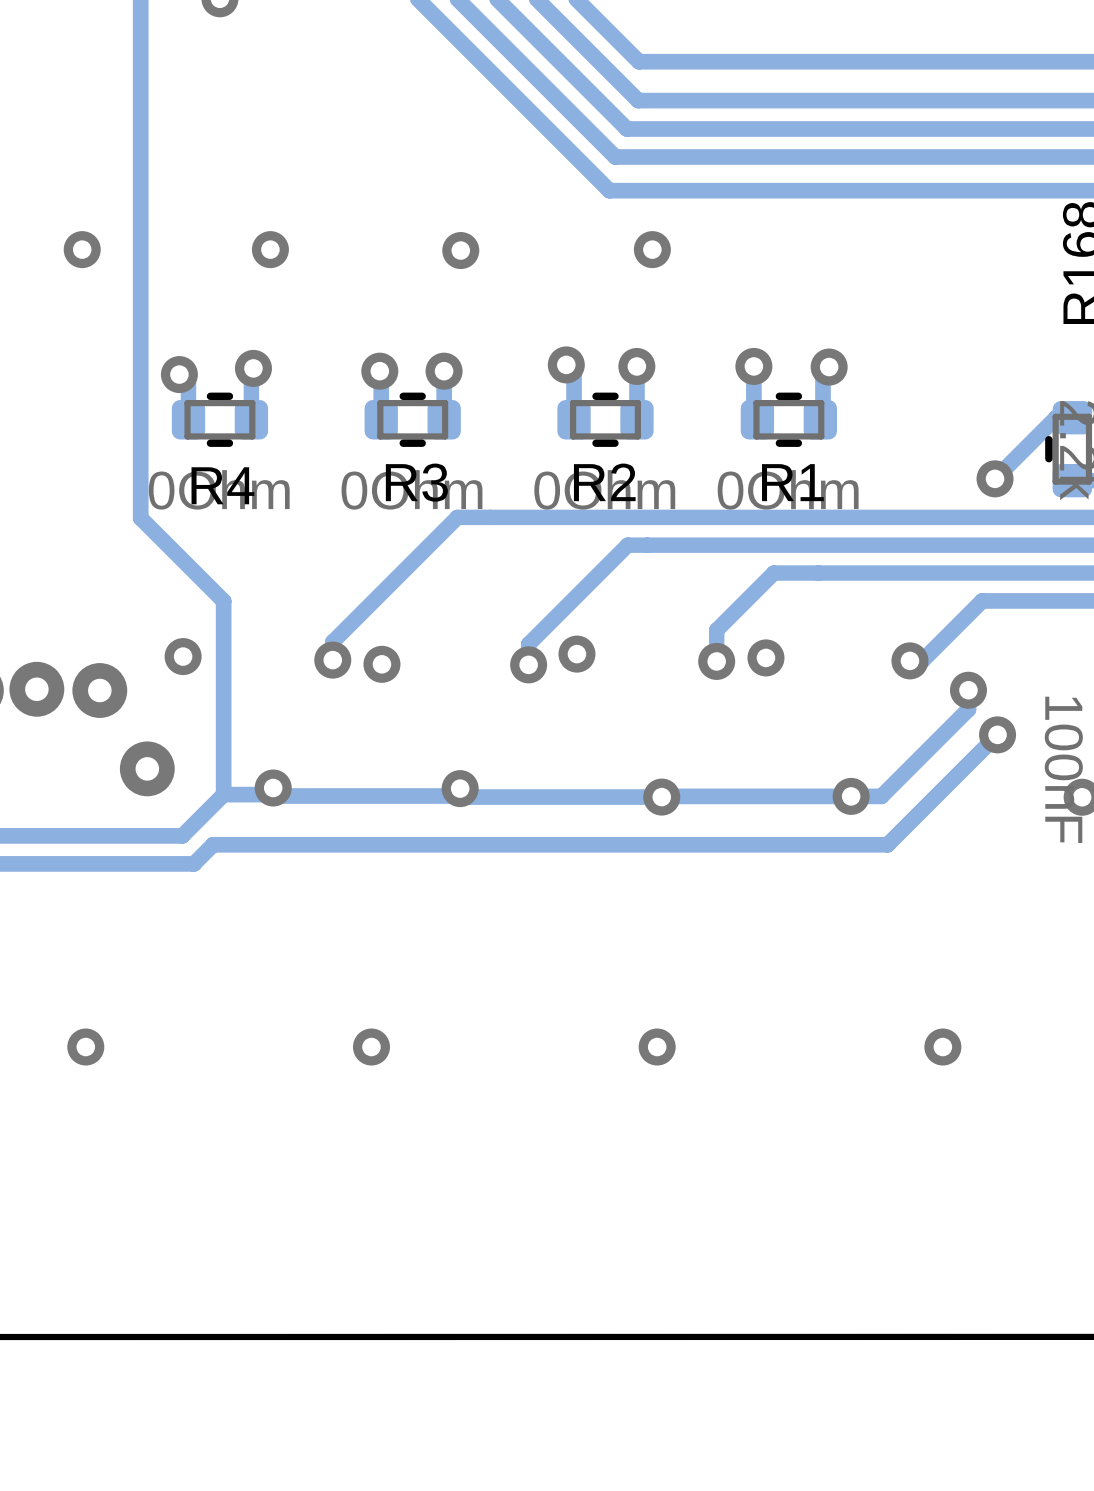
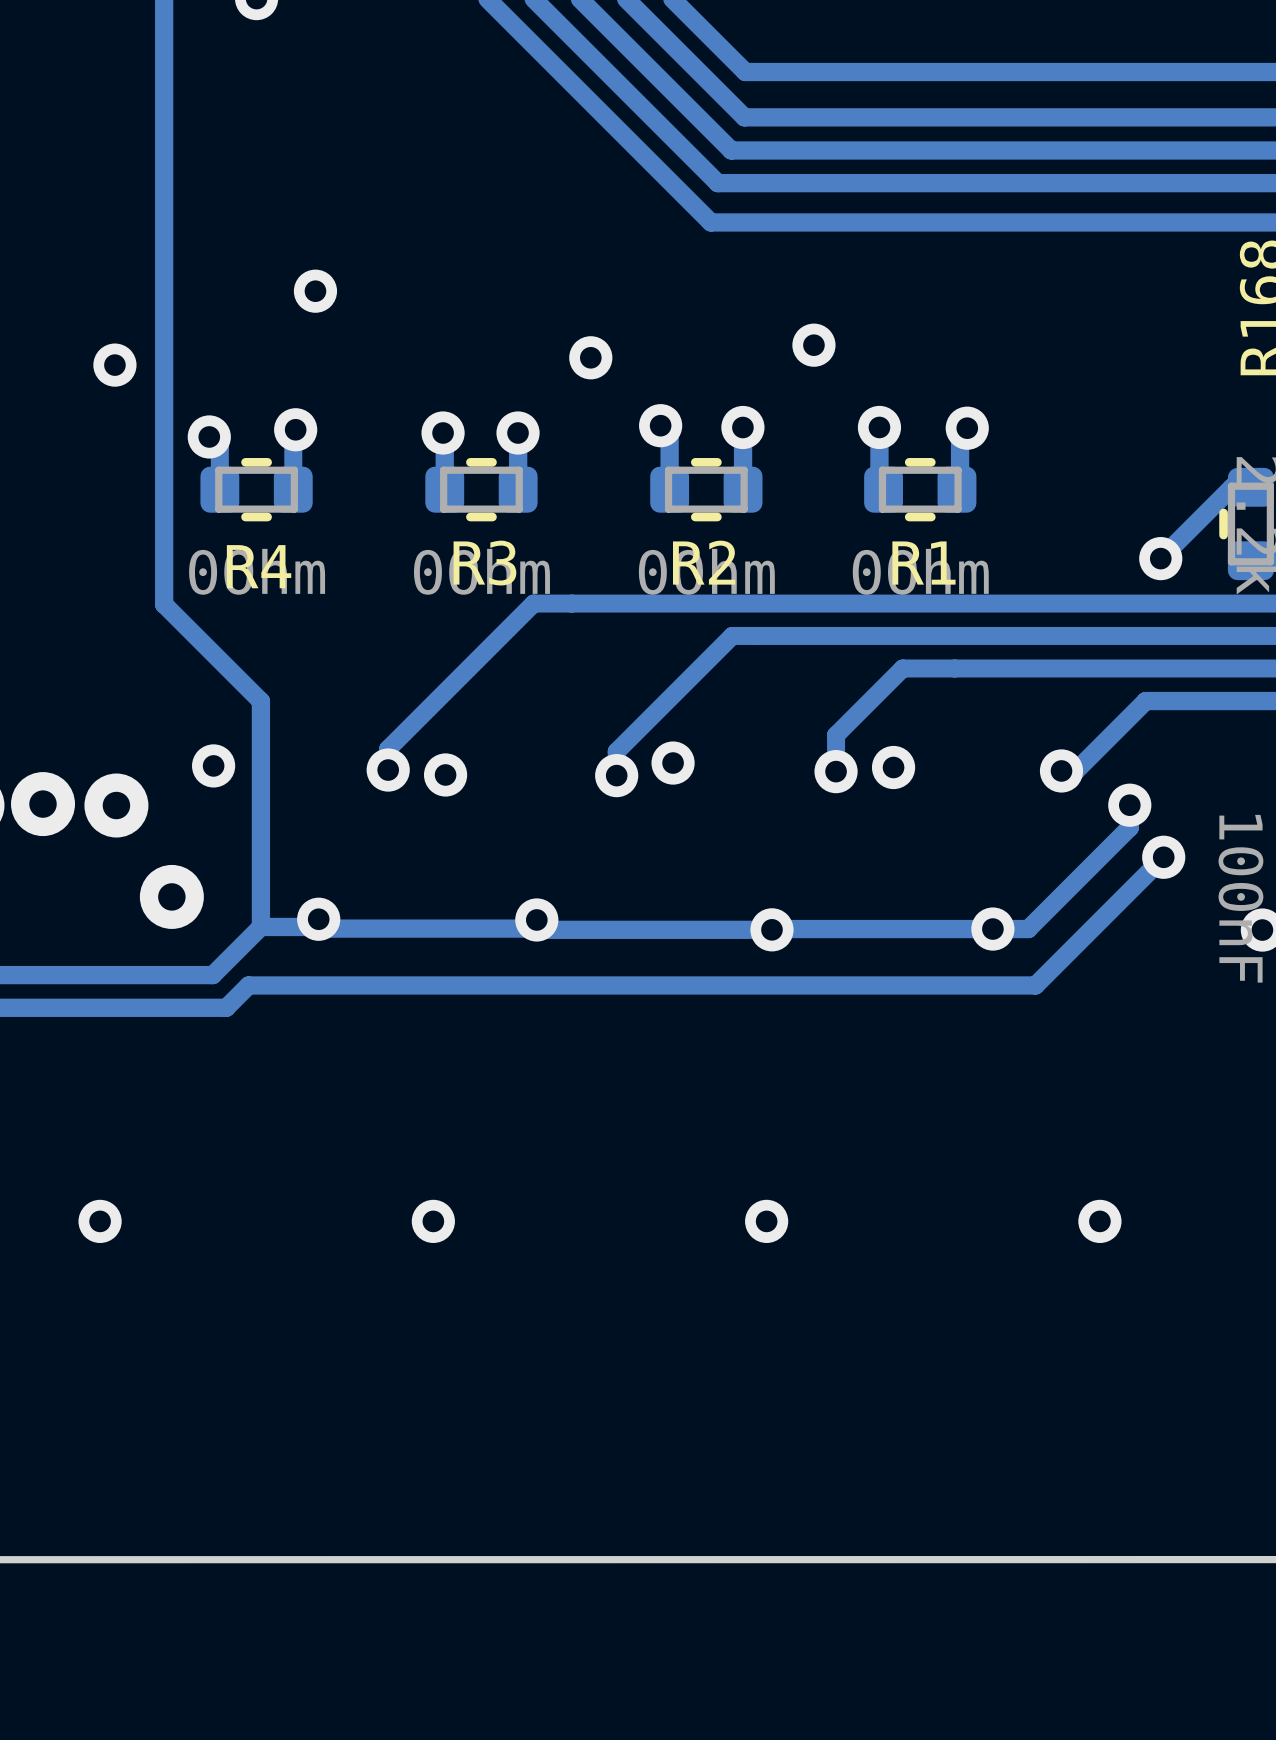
via position: (82, 249) -> (114, 365)
via position: (652, 249) -> (813, 345)
via position: (460, 250) -> (590, 357)

